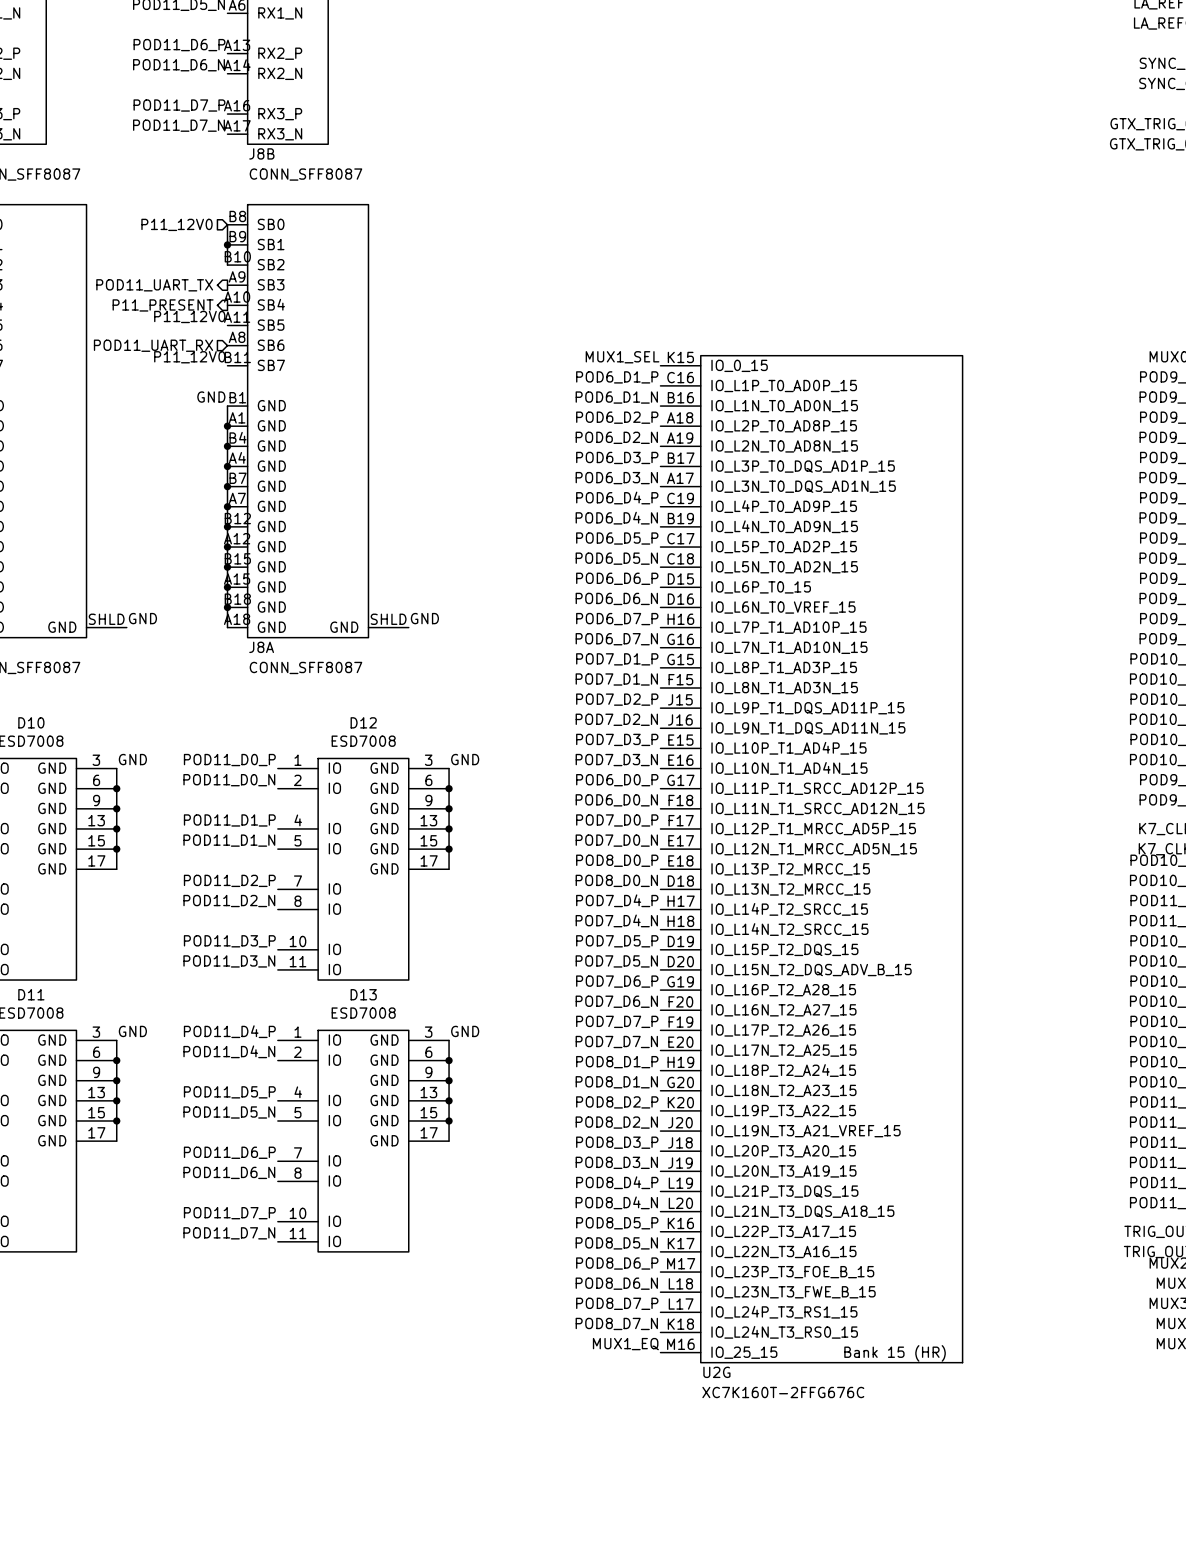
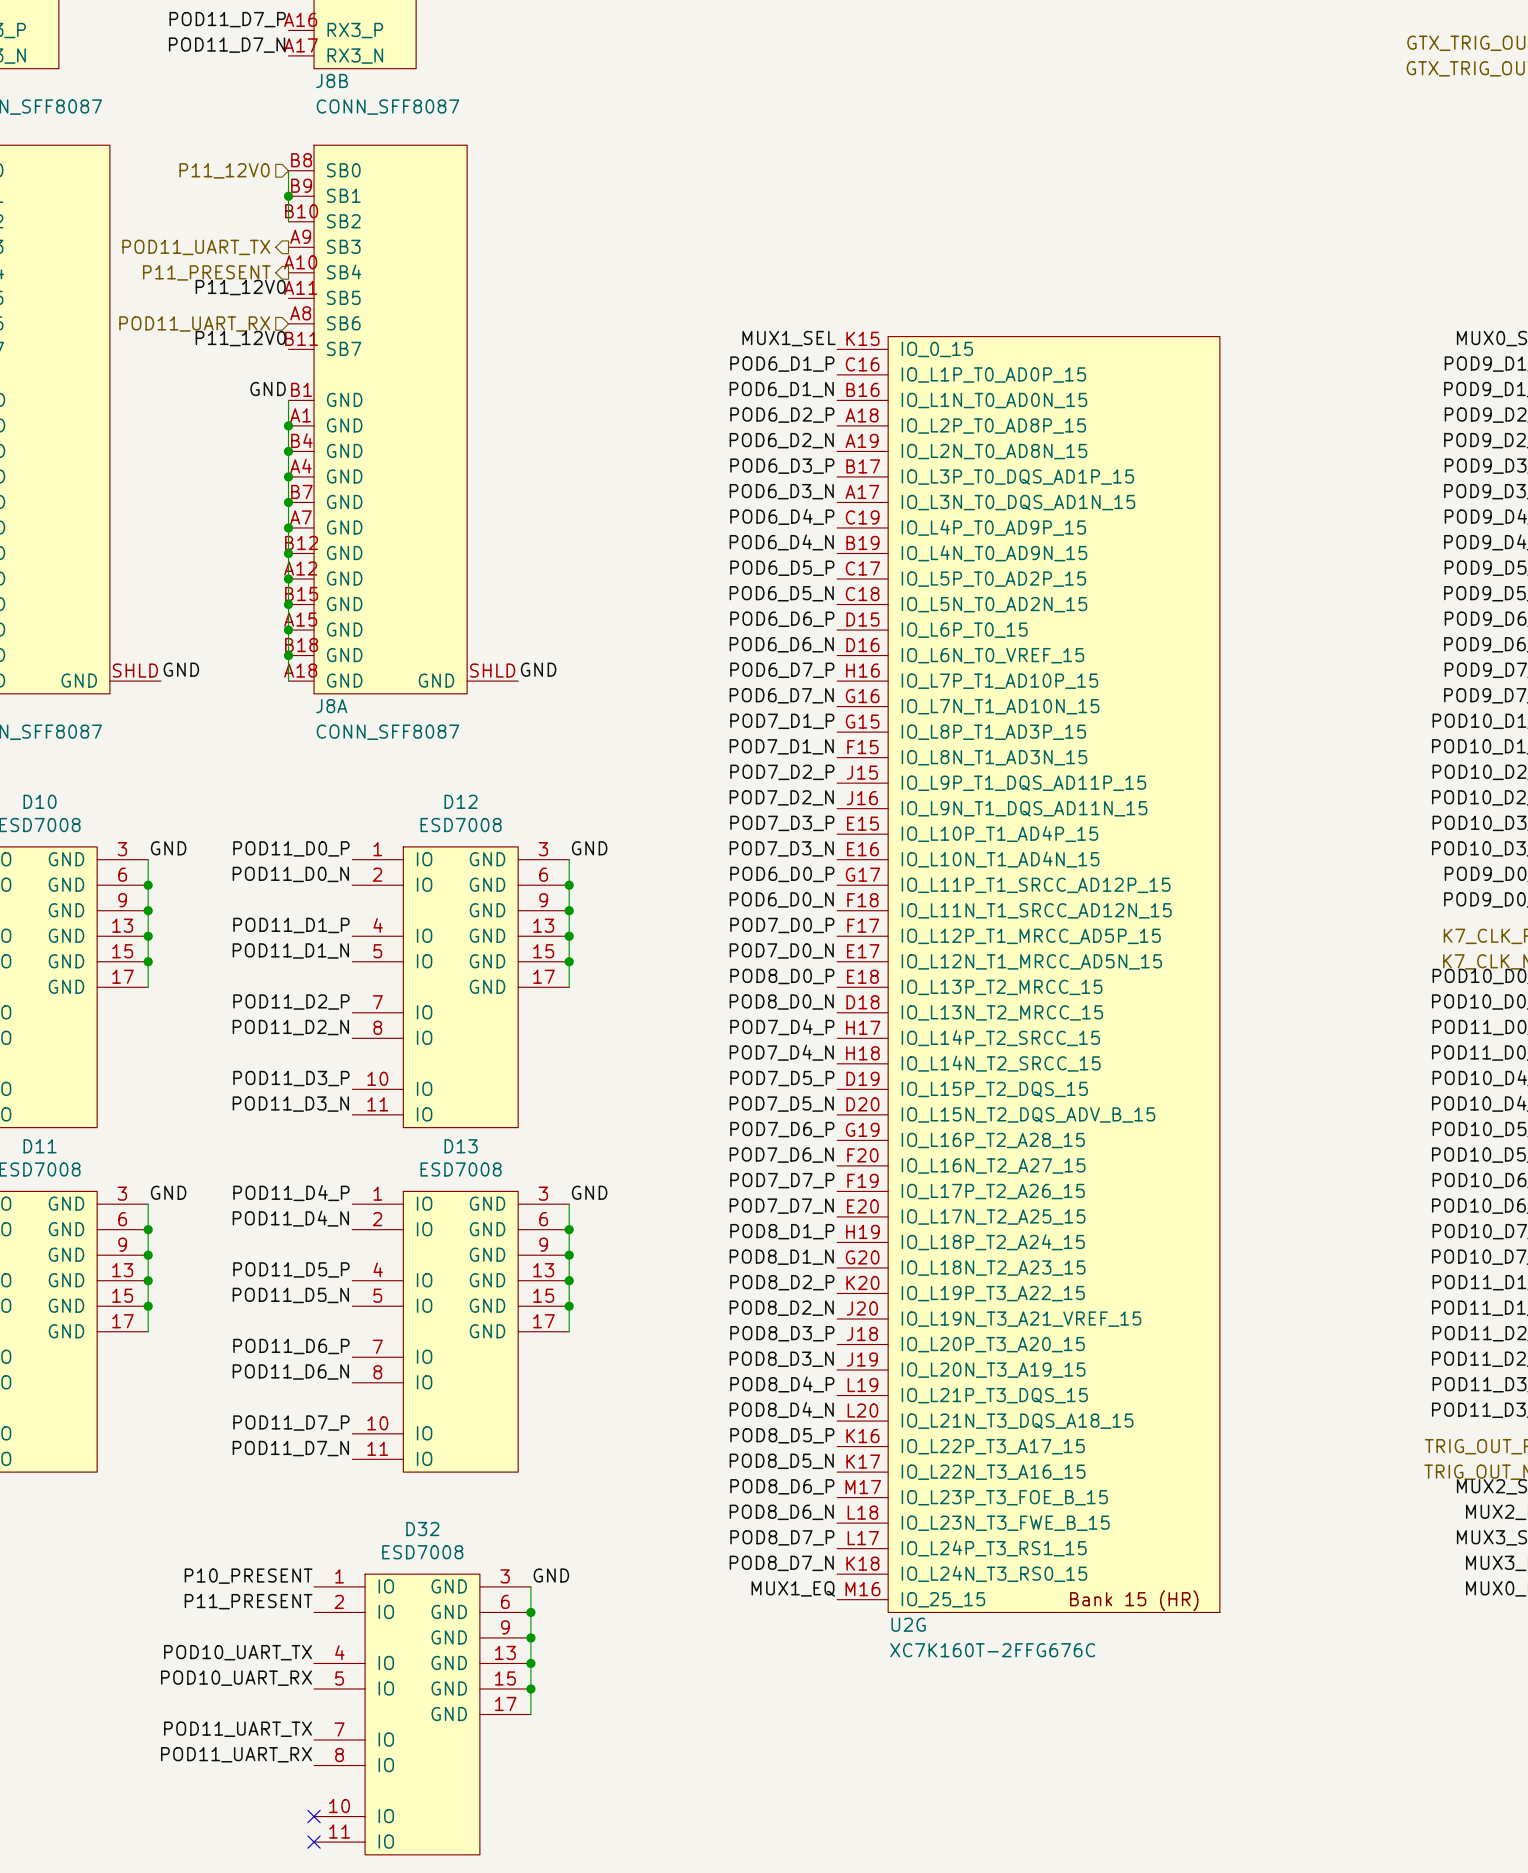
label: none -> GND (551, 1575)
label: none -> P10_PRESENT (248, 1576)
wire: none -> (530, 1586) (530, 1714)
label: none -> P11_PRESENT (248, 1601)
junction: none -> (530, 1612)
junction: none -> (530, 1637)
label: none -> POD10_UART_TX (237, 1652)
junction: none -> (530, 1663)
label: none -> POD10_UART_RX (236, 1678)
junction: none -> (530, 1688)
D32: none -> ESD7008 (422, 1714)
label: none -> POD11_UART_TX (237, 1729)
label: none -> POD11_UART_RX (236, 1754)
no-connect mark: none -> (314, 1816)
no-connect mark: none -> (314, 1842)

